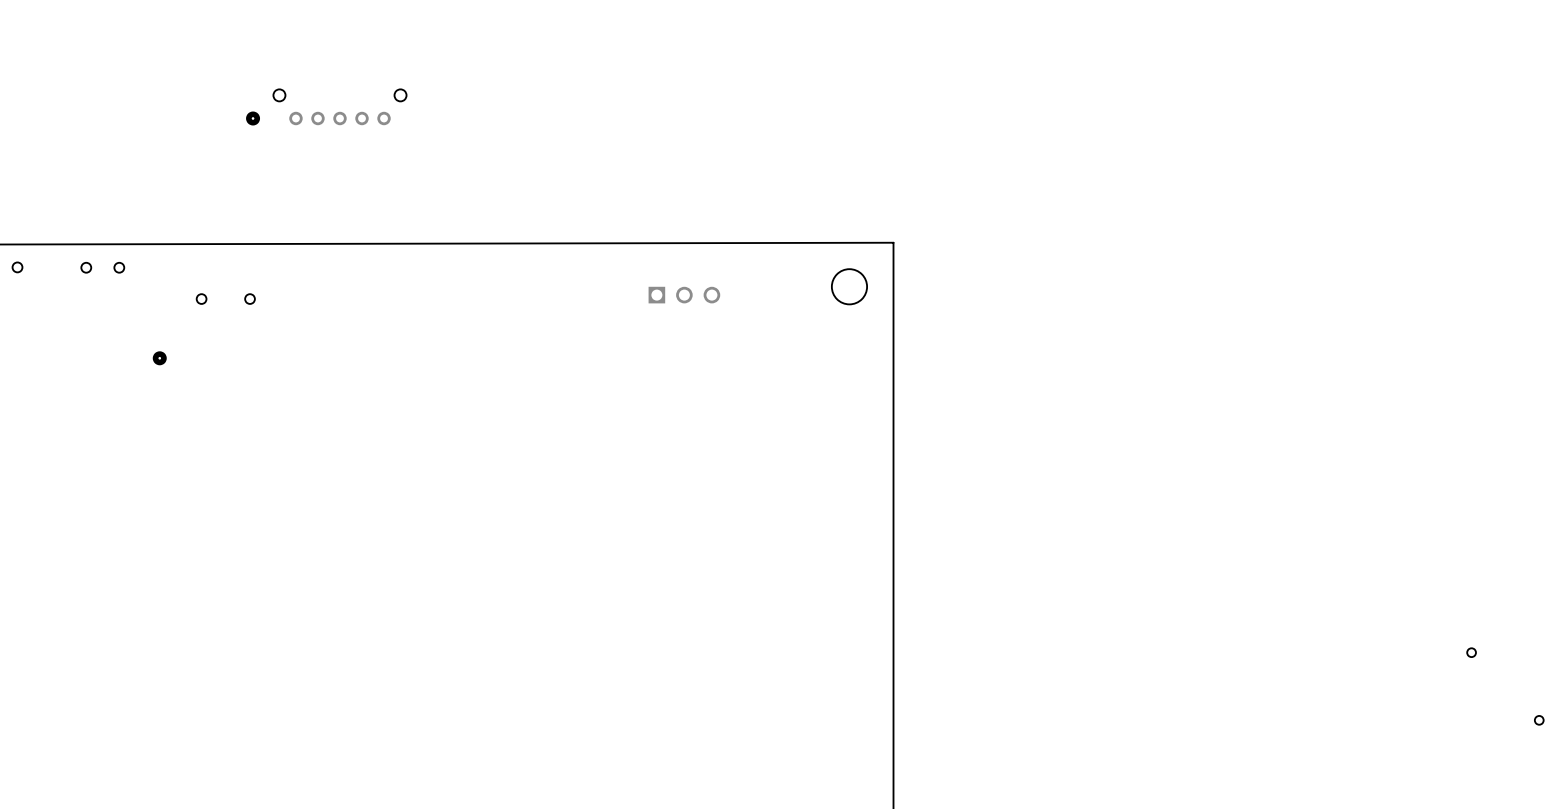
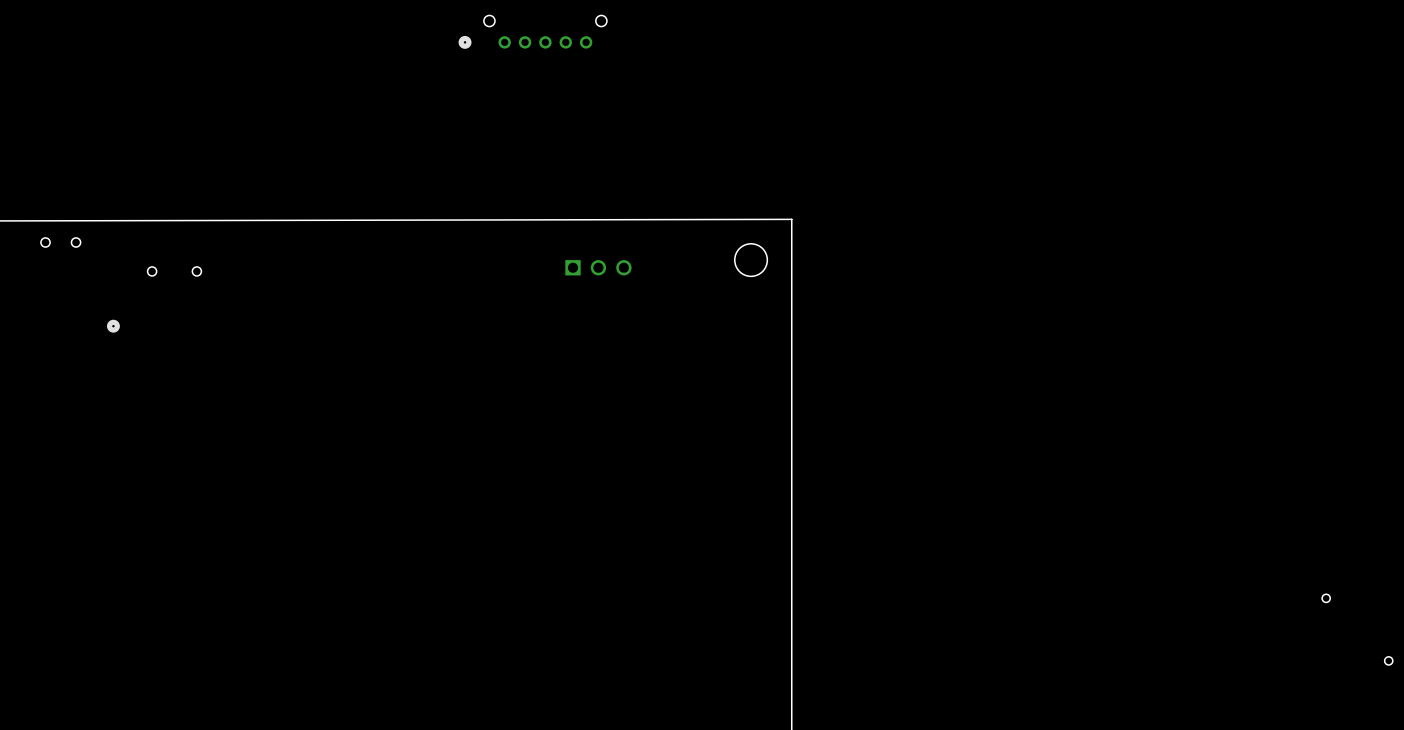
part: none -> (532, 32)
part: (326, 107) -> none

